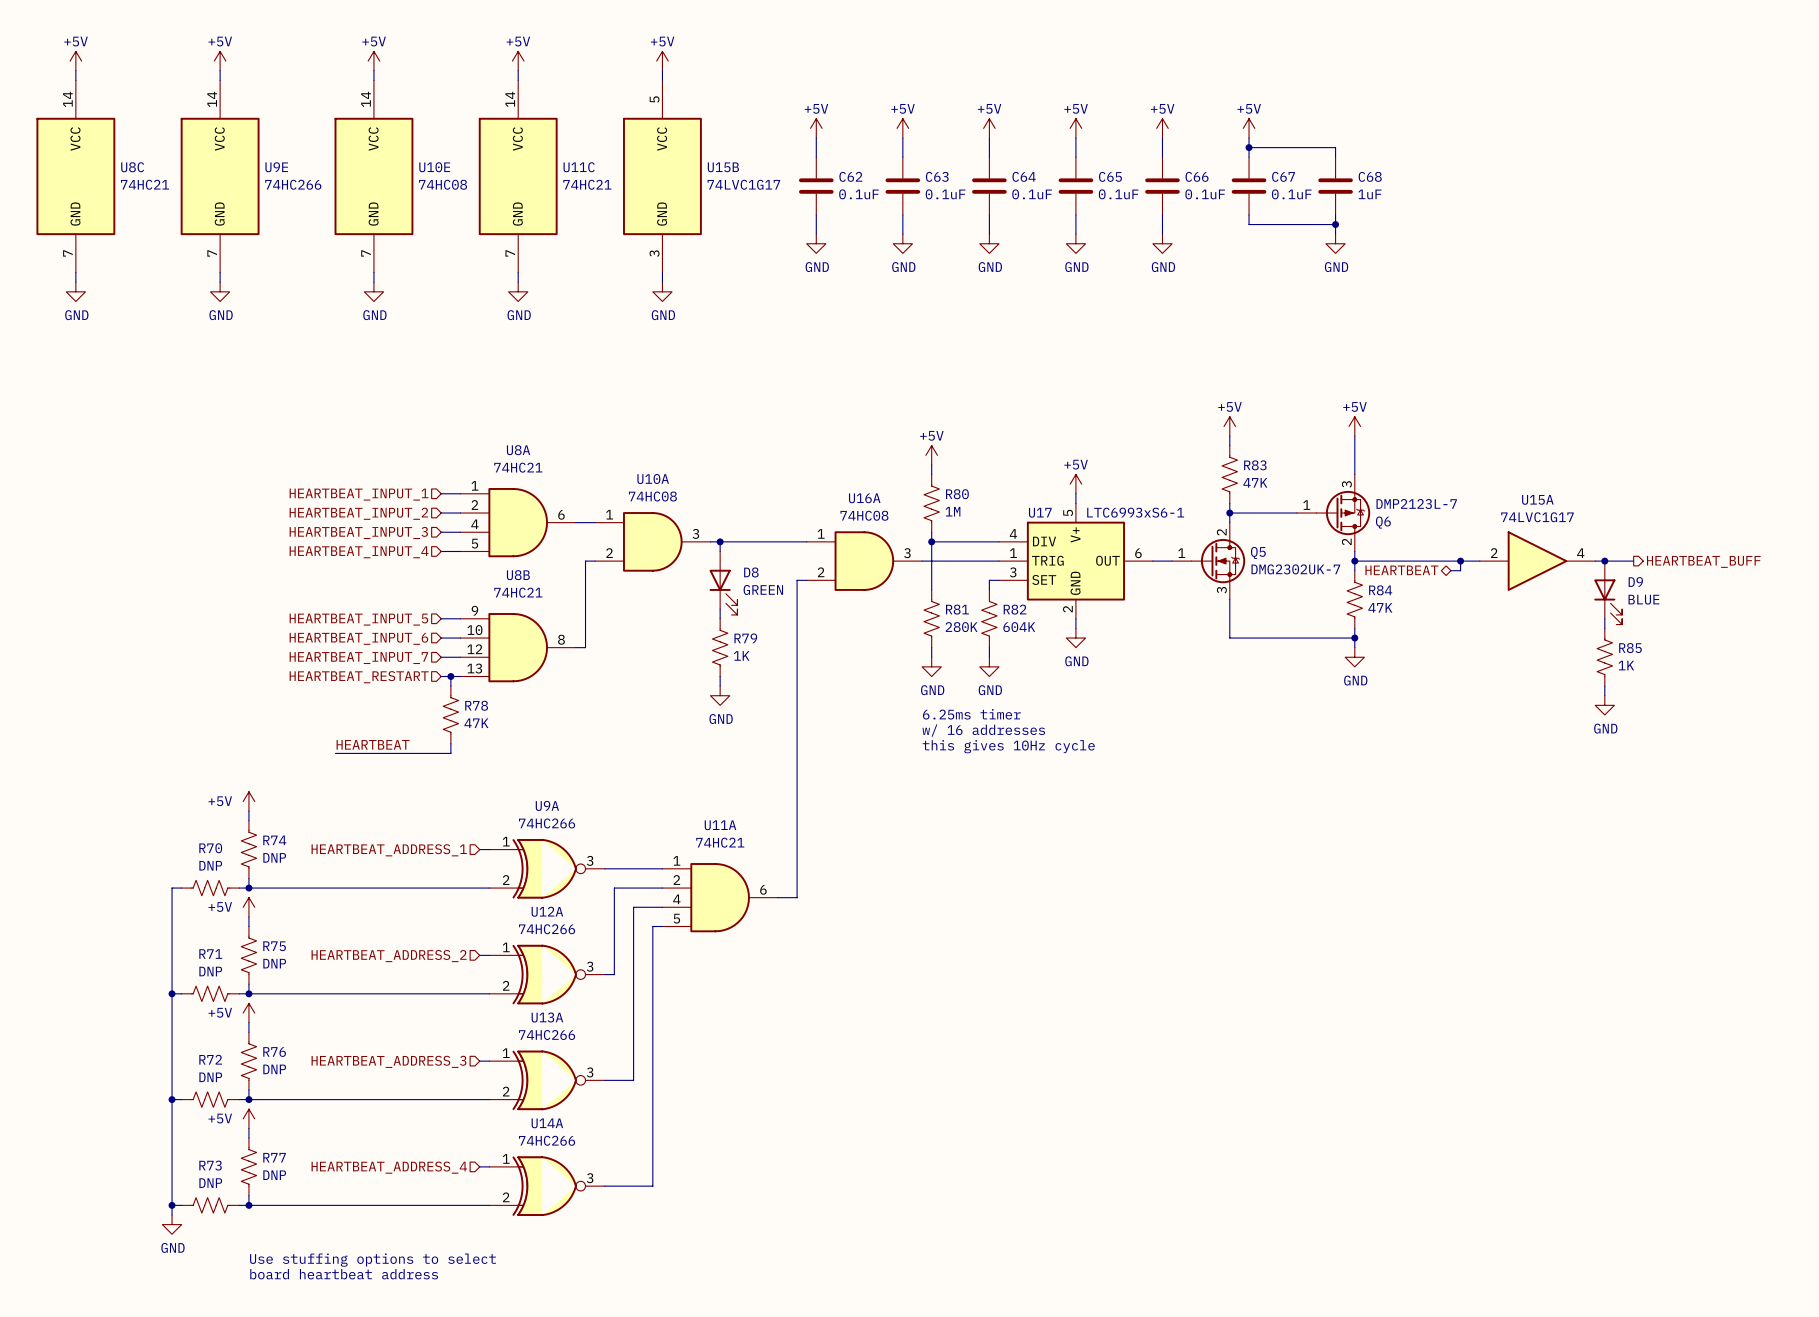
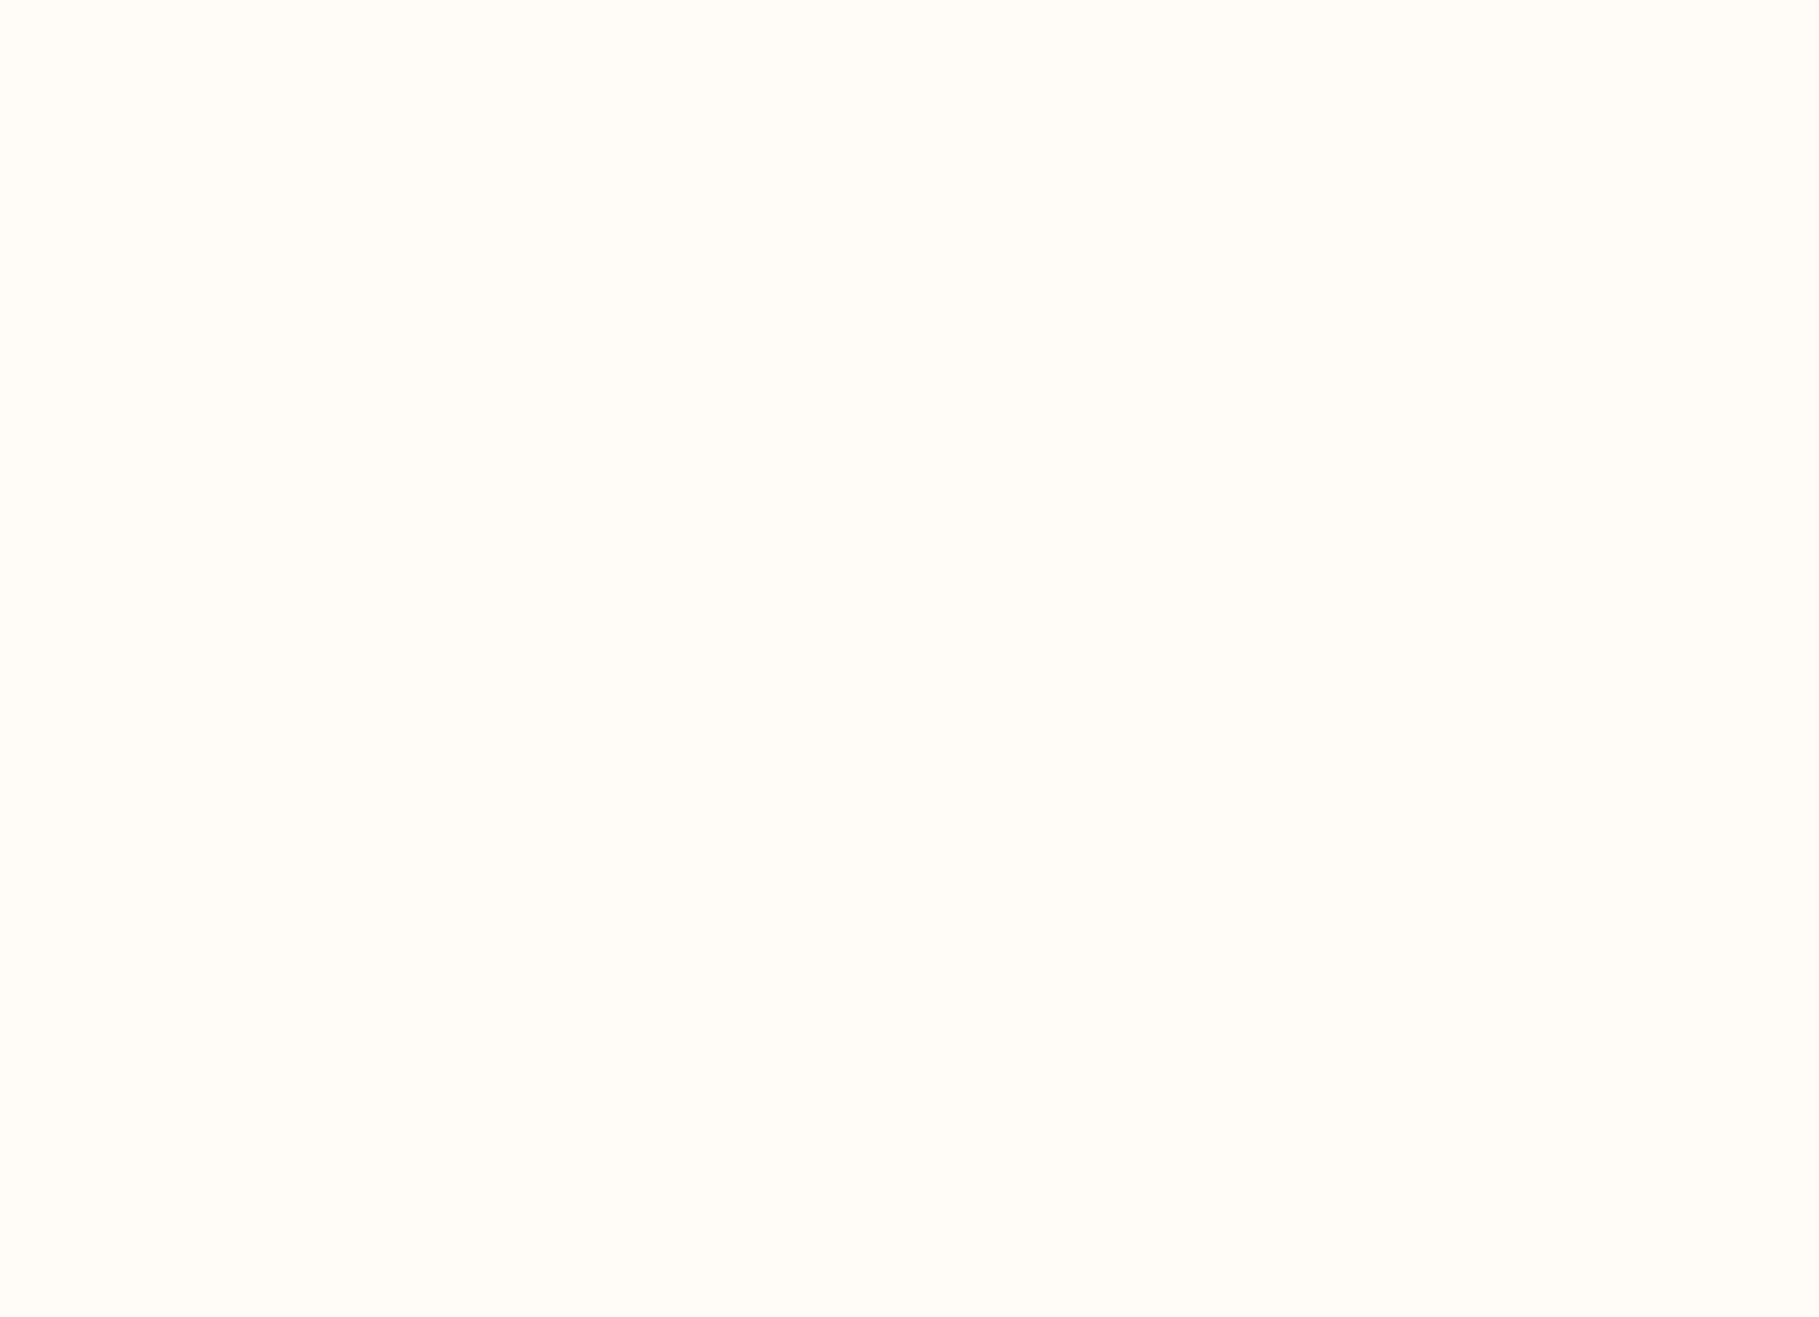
power symbol: +5V (75, 61) -> none
power symbol: +5V (220, 61) -> none
power symbol: +5V (373, 61) -> none
power symbol: +5V (518, 61) -> none
power symbol: +5V (662, 61) -> none
wire: (75, 70) (75, 80) -> none
wire: (220, 70) (220, 80) -> none
wire: (373, 70) (373, 80) -> none
wire: (518, 70) (518, 80) -> none
wire: (662, 70) (662, 80) -> none
power symbol: +5V (816, 128) -> none
power symbol: +5V (902, 128) -> none
power symbol: +5V (989, 128) -> none
power symbol: +5V (1075, 128) -> none
power symbol: +5V (1162, 128) -> none
power symbol: +5V (1249, 128) -> none
wire: (816, 137) (816, 157) -> none
wire: (902, 137) (902, 157) -> none
wire: (989, 137) (989, 157) -> none
wire: (1075, 137) (1075, 157) -> none
wire: (1162, 137) (1162, 157) -> none
wire: (1249, 137) (1249, 157) -> none
wire: (1249, 147) (1335, 147) (1335, 157) -> none
junction: (1249, 147) -> none
U8C: 74HC21 (75, 176) -> none
U9E: 74HC266 (220, 176) -> none
U10E: 74HC08 (373, 176) -> none
U11C: 74HC21 (518, 176) -> none
U15B: 74LVC1G17 (662, 176) -> none
C62: 0.1uF (816, 186) -> none
C63: 0.1uF (902, 186) -> none
C64: 0.1uF (989, 186) -> none
C65: 0.1uF (1075, 186) -> none
C66: 0.1uF (1162, 186) -> none
C67: 0.1uF (1249, 186) -> none
C68: 1uF (1335, 186) -> none
wire: (816, 214) (816, 234) -> none
wire: (902, 214) (902, 234) -> none
wire: (989, 214) (989, 234) -> none
wire: (1075, 214) (1075, 234) -> none
wire: (1162, 214) (1162, 234) -> none
wire: (1249, 214) (1249, 224) (1335, 224) -> none
wire: (1335, 214) (1335, 234) -> none
junction: (1335, 224) -> none
power symbol: GND (816, 243) -> none
power symbol: GND (902, 243) -> none
power symbol: GND (989, 243) -> none
power symbol: GND (1075, 243) -> none
power symbol: GND (1162, 243) -> none
power symbol: GND (1335, 243) -> none
wire: (75, 272) (75, 282) -> none
wire: (220, 272) (220, 282) -> none
wire: (373, 272) (373, 282) -> none
wire: (518, 272) (518, 282) -> none
wire: (662, 272) (662, 282) -> none
power symbol: GND (75, 291) -> none
power symbol: GND (220, 291) -> none
power symbol: GND (373, 291) -> none
power symbol: GND (518, 291) -> none
power symbol: GND (662, 291) -> none
power symbol: +5V (1229, 426) -> none
power symbol: +5V (1354, 426) -> none
wire: (1229, 436) (1229, 445) -> none
wire: (1354, 436) (1354, 474) -> none
power symbol: +5V (931, 455) -> none
wire: (931, 464) (931, 474) -> none
R83: 47K (1229, 474) -> none
power symbol: +5V (1075, 484) -> none
wire: (441, 493) (460, 493) -> none
wire: (1075, 493) (1075, 503) -> none
hierarchical label: HEARTBEAT_INPUT_1 (359, 494) -> none
R80: 1M (931, 503) -> none
wire: (1229, 503) (1229, 522) -> none
hierarchical label: HEARTBEAT_INPUT_2 (358, 513) -> none
wire: (441, 513) (460, 513) -> none
wire: (1229, 513) (1297, 513) -> none
junction: (1229, 513) -> none
Q6: DMP2123L-7 (1333, 513) -> none
U8A: 74HC21 (518, 522) -> none
wire: (575, 522) (595, 522) -> none
hierarchical label: HEARTBEAT_INPUT_3 (358, 532) -> none
wire: (441, 532) (460, 532) -> none
wire: (931, 532) (931, 589) -> none
U10A: 74HC08 (652, 541) -> none
wire: (710, 541) (806, 541) -> none
wire: (720, 541) (720, 551) -> none
junction: (720, 541) -> none
wire: (931, 541) (999, 541) -> none
junction: (931, 541) -> none
wire: (441, 551) (460, 551) -> none
wire: (1354, 551) (1354, 570) -> none
hierarchical label: HEARTBEAT_INPUT_4 (359, 552) -> none
wire: (595, 561) (585, 561) (585, 647) (575, 647) -> none
U16A: 74HC08 (864, 561) -> none
wire: (922, 561) (999, 561) -> none
U17: LTC6993xS6-1 (1075, 561) -> none
wire: (1152, 561) (1172, 561) -> none
Q5: DMG2302UK-7 (1208, 561) -> none
wire: (1354, 561) (1479, 561) -> none
junction: (1354, 561) -> none
wire: (1460, 561) (1460, 570) (1450, 570) -> none
junction: (1460, 561) -> none
U15A: 74LVC1G17 (1537, 561) -> none
wire: (1595, 561) (1633, 561) -> none
junction: (1604, 561) -> none
hierarchical label: HEARTBEAT_BUFF (1703, 561) -> none
hierarchical label: HEARTBEAT (1401, 570) -> none
wire: (806, 580) (797, 580) (797, 897) (777, 897) -> none
wire: (999, 580) (989, 580) (989, 589) -> none
D8: GREEN (723, 583) -> none
D9: BLUE (1608, 592) -> none
wire: (1229, 599) (1229, 638) (1354, 638) -> none
R84: 47K (1354, 599) -> none
wire: (720, 609) (720, 618) -> none
wire: (441, 618) (460, 618) -> none
R81: 280K (931, 618) -> none
R82: 604K (989, 618) -> none
wire: (1075, 618) (1075, 628) -> none
wire: (1604, 618) (1604, 628) -> none
hierarchical label: HEARTBEAT_INPUT_5 (358, 619) -> none
wire: (1354, 628) (1354, 647) -> none
hierarchical label: HEARTBEAT_INPUT_6 (358, 638) -> none
wire: (441, 638) (460, 638) -> none
power symbol: GND (1075, 638) -> none
junction: (1354, 638) -> none
U8B: 74HC21 (518, 647) -> none
R79: 1K (720, 647) -> none
wire: (931, 647) (931, 657) -> none
wire: (989, 647) (989, 657) -> none
wire: (441, 657) (460, 657) -> none
power symbol: GND (1354, 657) -> none
R85: 1K (1604, 657) -> none
hierarchical label: HEARTBEAT_INPUT_7 (358, 658) -> none
power symbol: GND (931, 666) -> none
power symbol: GND (989, 666) -> none
wire: (441, 676) (460, 676) -> none
wire: (450, 676) (450, 686) -> none
junction: (450, 676) -> none
wire: (720, 676) (720, 686) -> none
hierarchical label: HEARTBEAT_RESTART (359, 677) -> none
wire: (1604, 686) (1604, 695) -> none
power symbol: GND (720, 695) -> none
power symbol: GND (1604, 705) -> none
R78: 47K (450, 714) -> none
text: 6.25ms timer (971, 714) -> none
text: w/ 16 addresses (983, 730) -> none
wire: (450, 743) (450, 753) (335, 753) -> none
label: HEARTBEAT (373, 744) -> none
text: this gives 10Hz cycle (1008, 746) -> none
power symbol: +5V (248, 801) -> none
wire: (248, 811) (248, 820) -> none
R74: DNP (248, 849) -> none
wire: (479, 849) (489, 849) -> none
hierarchical label: HEARTBEAT_ADDRESS_1 (389, 850) -> none
U9A: 74HC266 (547, 868) -> none
wire: (604, 868) (662, 868) -> none
wire: (248, 878) (248, 888) -> none
wire: (181, 888) (172, 888) (172, 1214) -> none
R70: DNP (210, 888) -> none
wire: (239, 888) (489, 888) -> none
junction: (248, 888) -> none
wire: (662, 888) (614, 888) (614, 974) (604, 974) -> none
U11A: 74HC21 (720, 897) -> none
power symbol: +5V (248, 907) -> none
wire: (662, 907) (633, 907) (633, 1080) (604, 1080) -> none
wire: (248, 916) (248, 926) -> none
wire: (662, 926) (652, 926) (652, 1186) (604, 1186) -> none
R75: DNP (248, 955) -> none
wire: (479, 955) (489, 955) -> none
hierarchical label: HEARTBEAT_ADDRESS_2 (389, 956) -> none
U12A: 74HC266 (547, 974) -> none
wire: (248, 984) (248, 993) -> none
wire: (172, 993) (181, 993) -> none
junction: (172, 993) -> none
R71: DNP (210, 993) -> none
wire: (239, 993) (489, 993) -> none
junction: (248, 993) -> none
power symbol: +5V (248, 1013) -> none
wire: (248, 1022) (248, 1032) -> none
R76: DNP (248, 1061) -> none
hierarchical label: HEARTBEAT_ADDRESS_3 (388, 1061) -> none
wire: (479, 1061) (489, 1061) -> none
U13A: 74HC266 (547, 1080) -> none
wire: (248, 1089) (248, 1099) -> none
wire: (172, 1099) (181, 1099) -> none
junction: (172, 1099) -> none
R72: DNP (210, 1099) -> none
wire: (239, 1099) (489, 1099) -> none
junction: (248, 1099) -> none
power symbol: +5V (248, 1118) -> none
wire: (248, 1128) (248, 1138) -> none
R77: DNP (248, 1166) -> none
wire: (479, 1166) (489, 1166) -> none
hierarchical label: HEARTBEAT_ADDRESS_4 (389, 1167) -> none
U14A: 74HC266 (547, 1186) -> none
wire: (248, 1195) (248, 1205) -> none
wire: (172, 1205) (181, 1205) -> none
junction: (172, 1205) -> none
R73: DNP (210, 1205) -> none
wire: (239, 1205) (489, 1205) -> none
junction: (248, 1205) -> none
power symbol: GND (172, 1224) -> none
text: Use stuffing options to select (372, 1260) -> none
text: board heartbeat address (344, 1274) -> none

